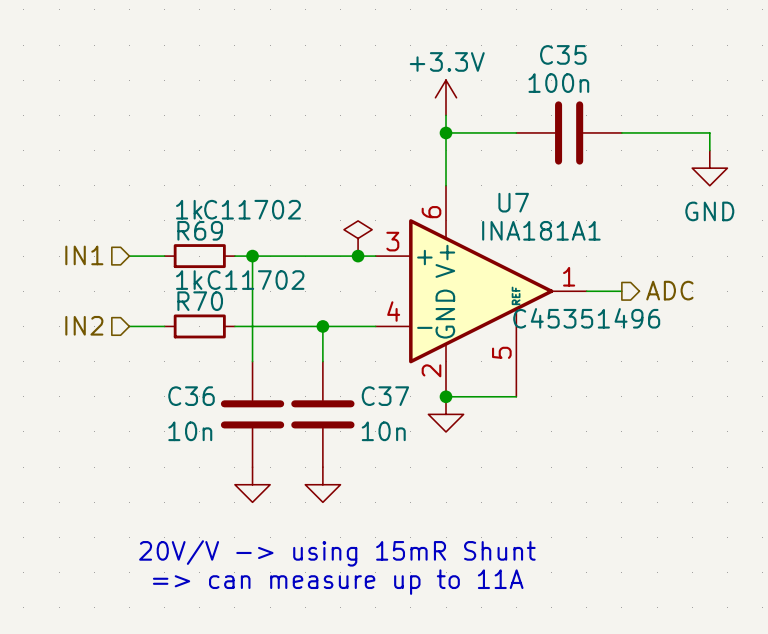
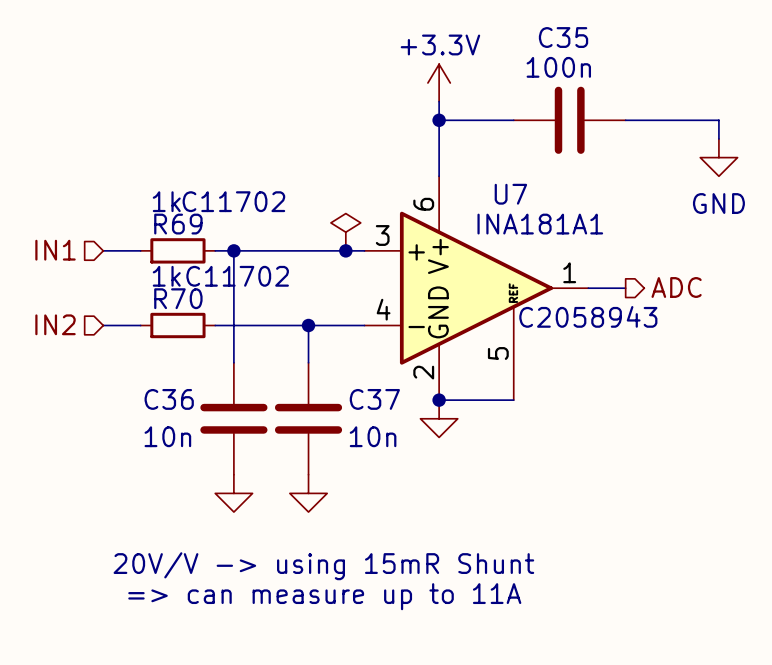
U7 text: C45351496 (586, 318) -> C2058943 (588, 316)

